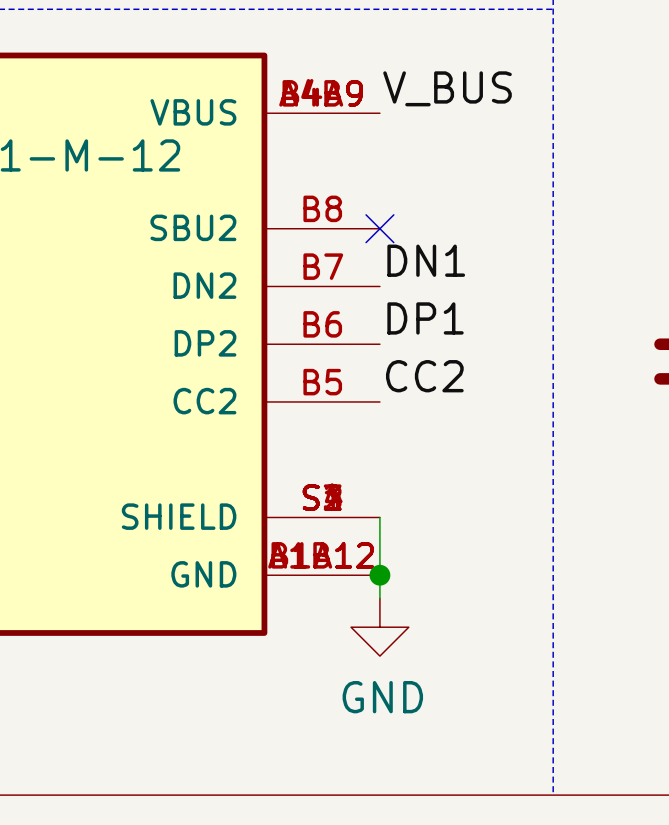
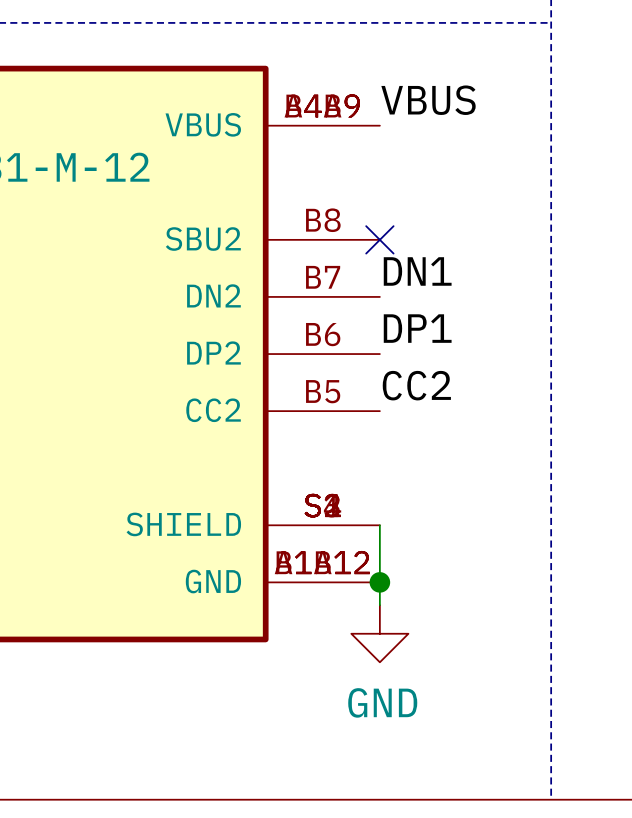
label: V_BUS (447, 88) -> VBUS (428, 100)

